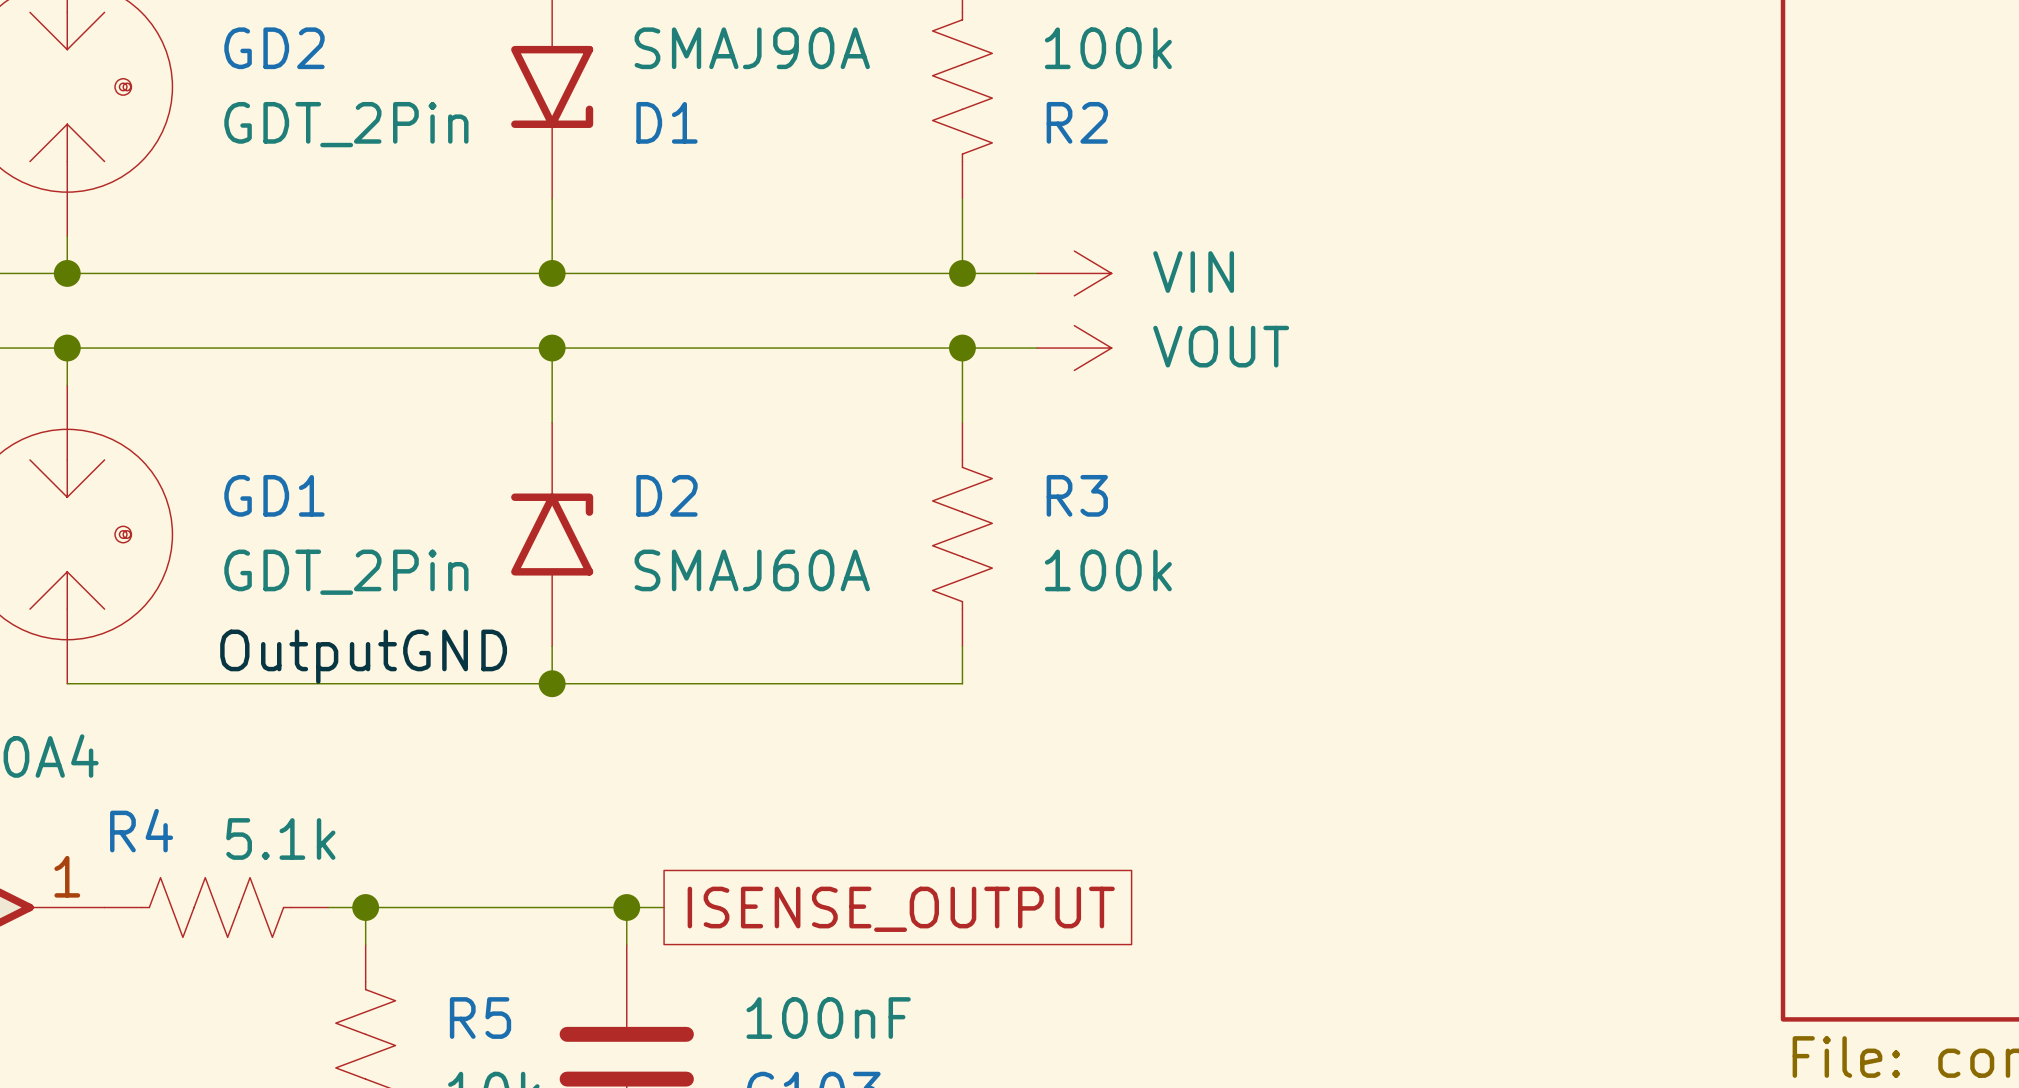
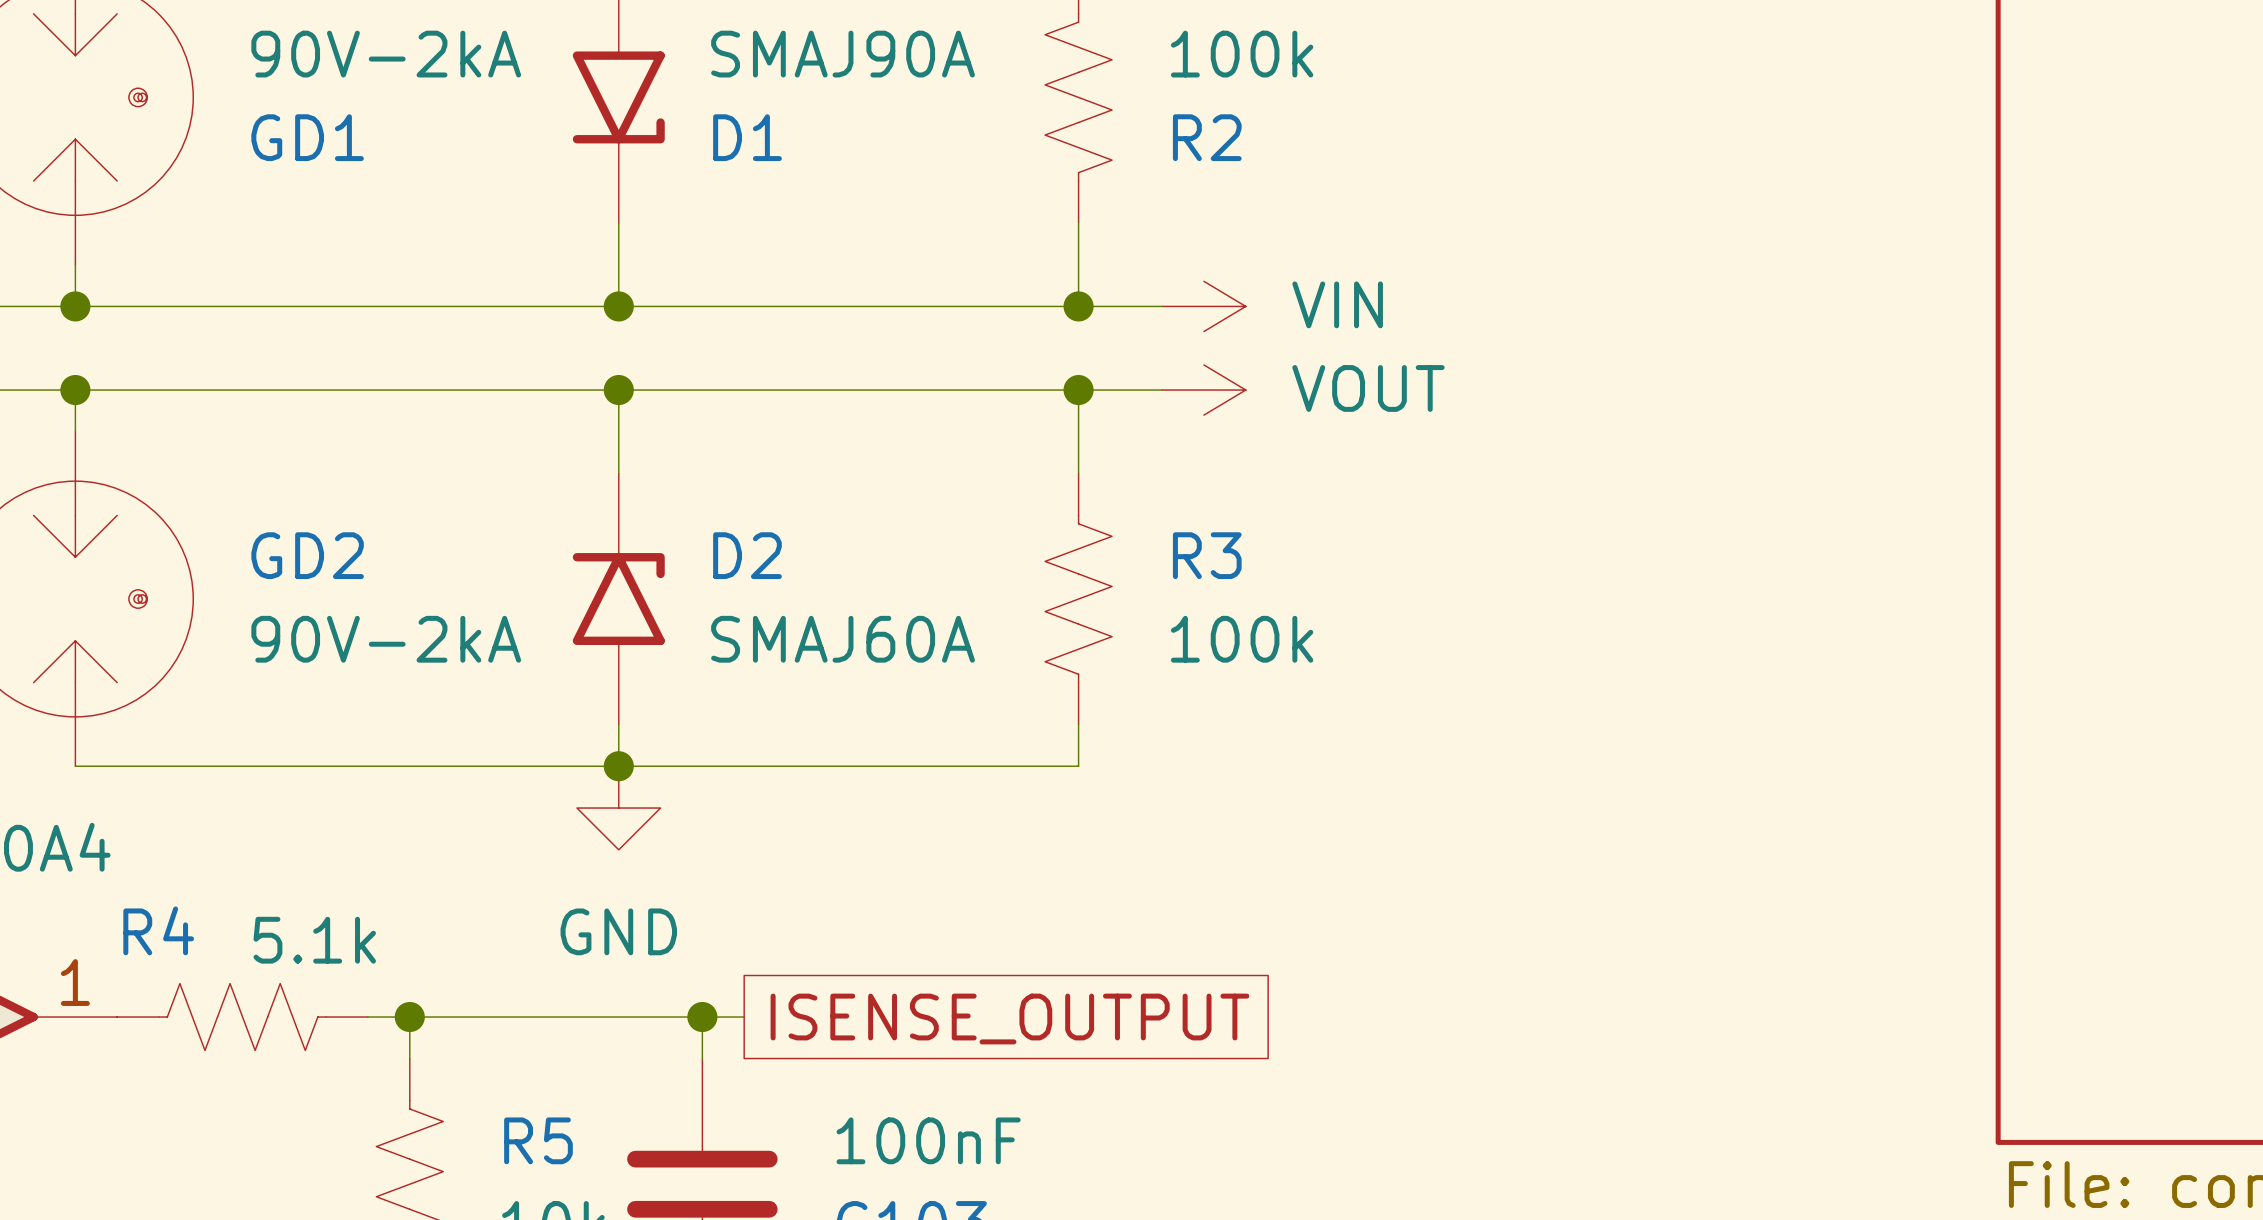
GD2 name: GD2 (274, 48) -> GD1 (307, 137)
GD2 value: GDT_2Pin (346, 124) -> 90V-2kA (386, 54)
GD1 name: GD1 (274, 495) -> GD2 (307, 555)
GD1 value: GDT_2Pin (346, 572) -> 90V-2kA (386, 639)
label: OutputGND (363, 656) -> none
power symbol: none -> GND (618, 808)

